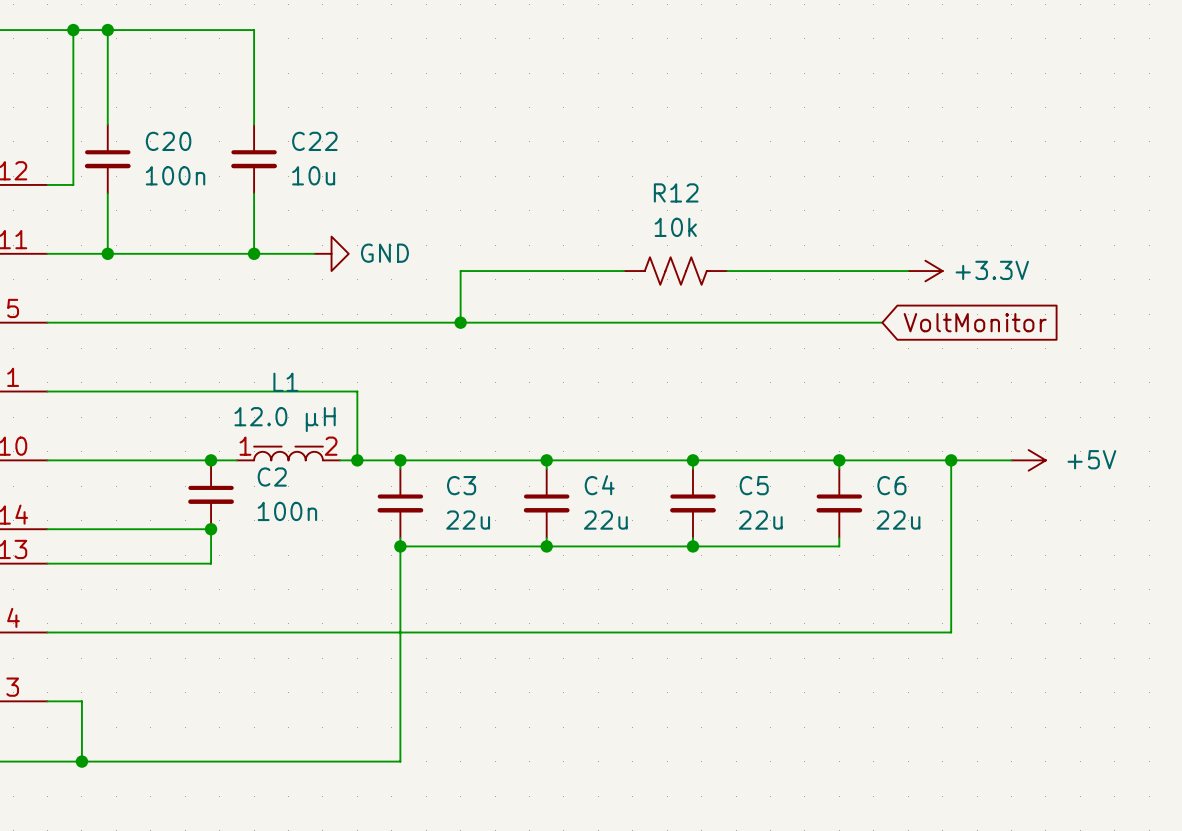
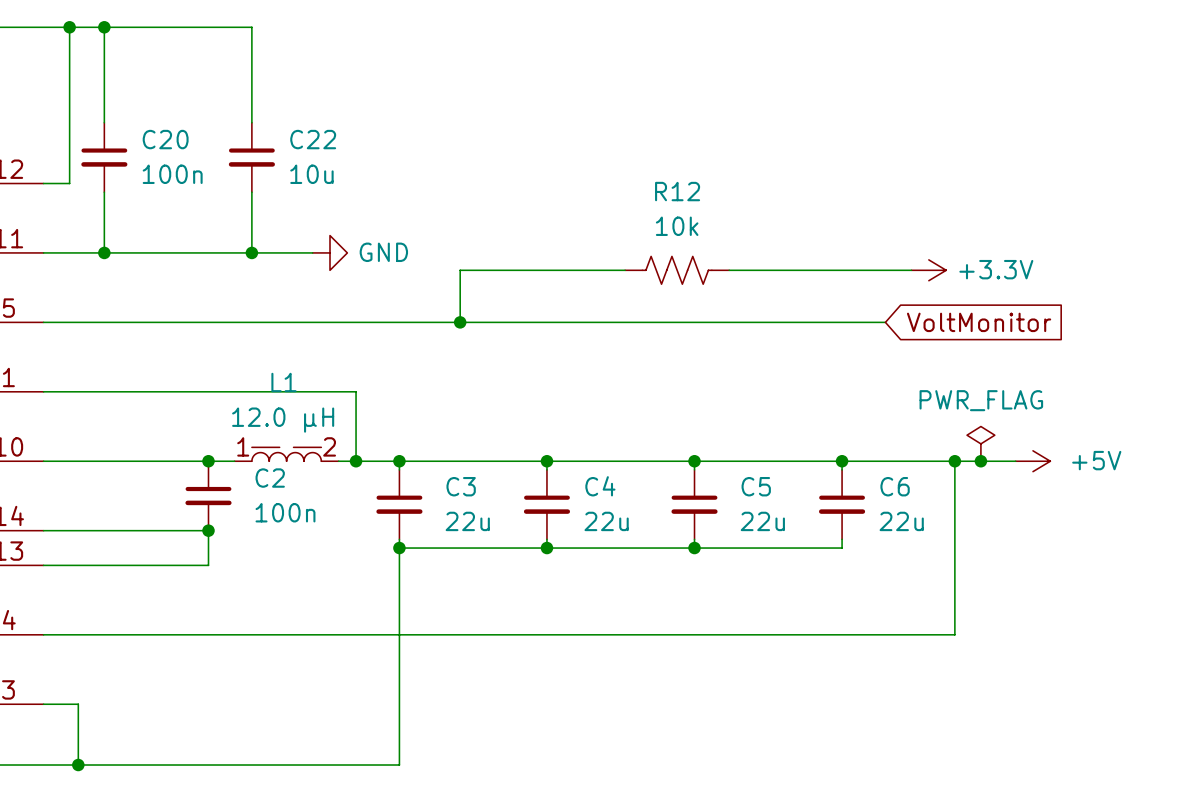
power symbol: none -> PWR_FLAG (980, 443)
junction: none -> (980, 461)

